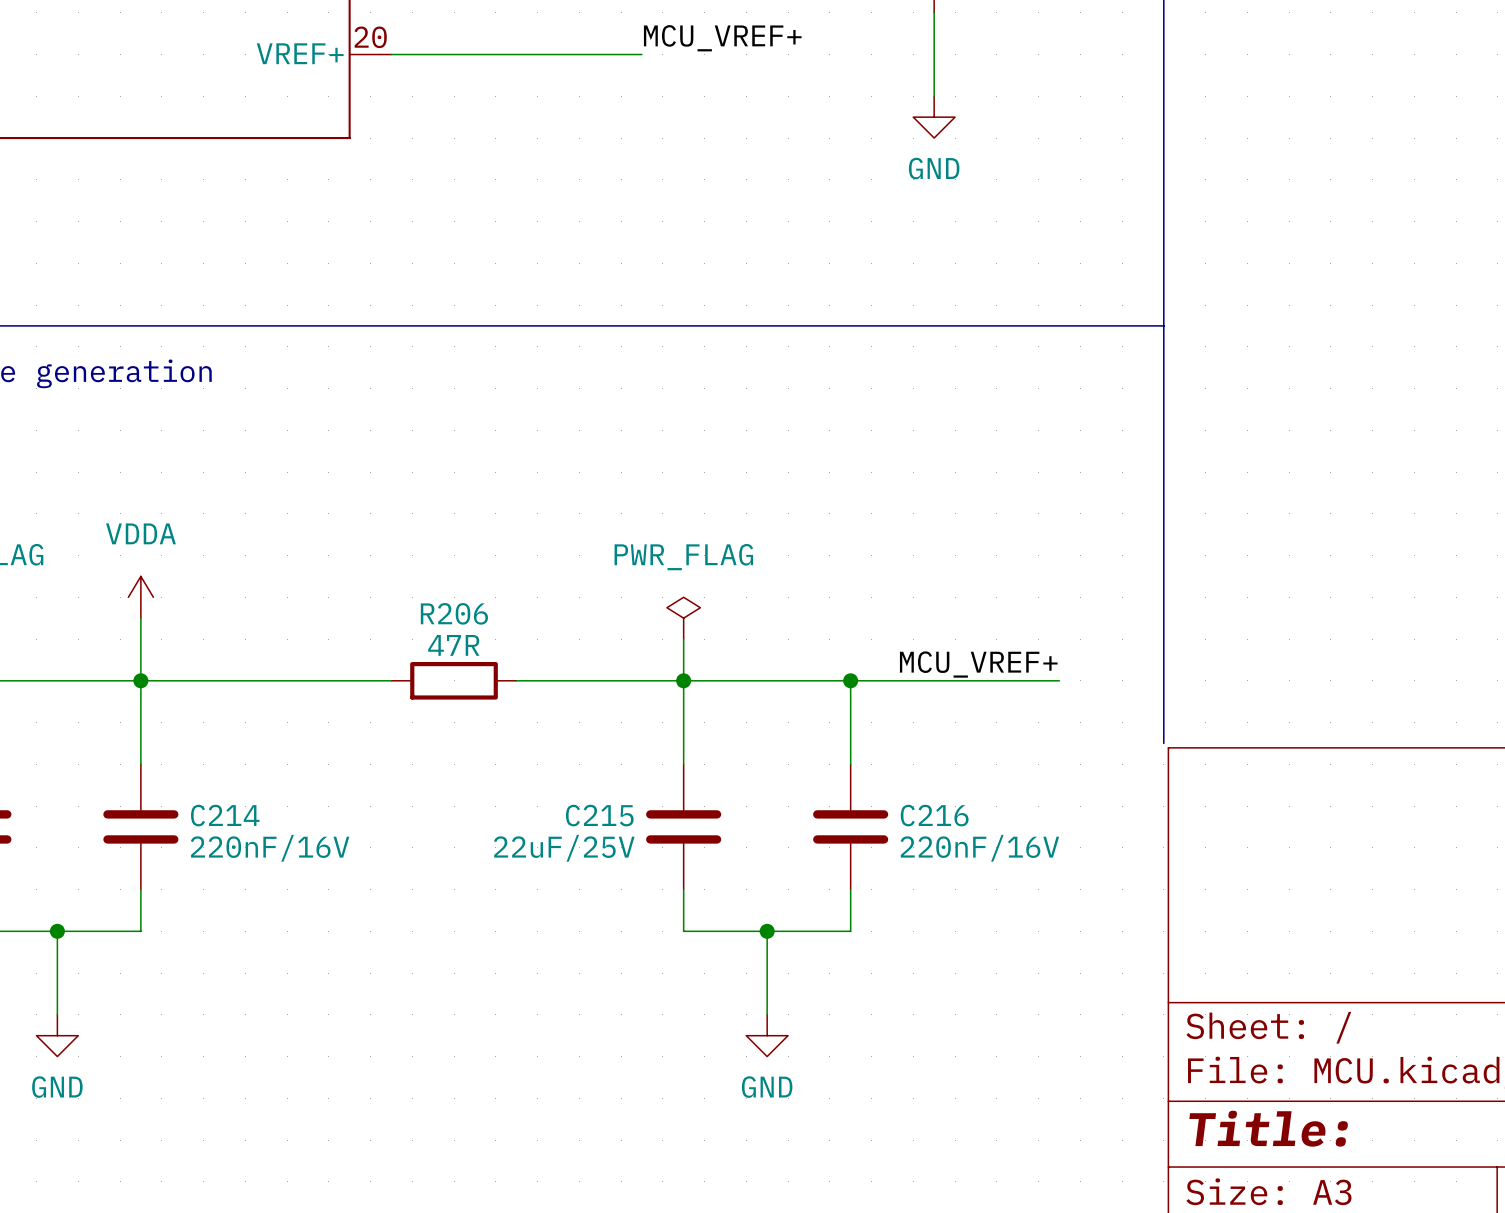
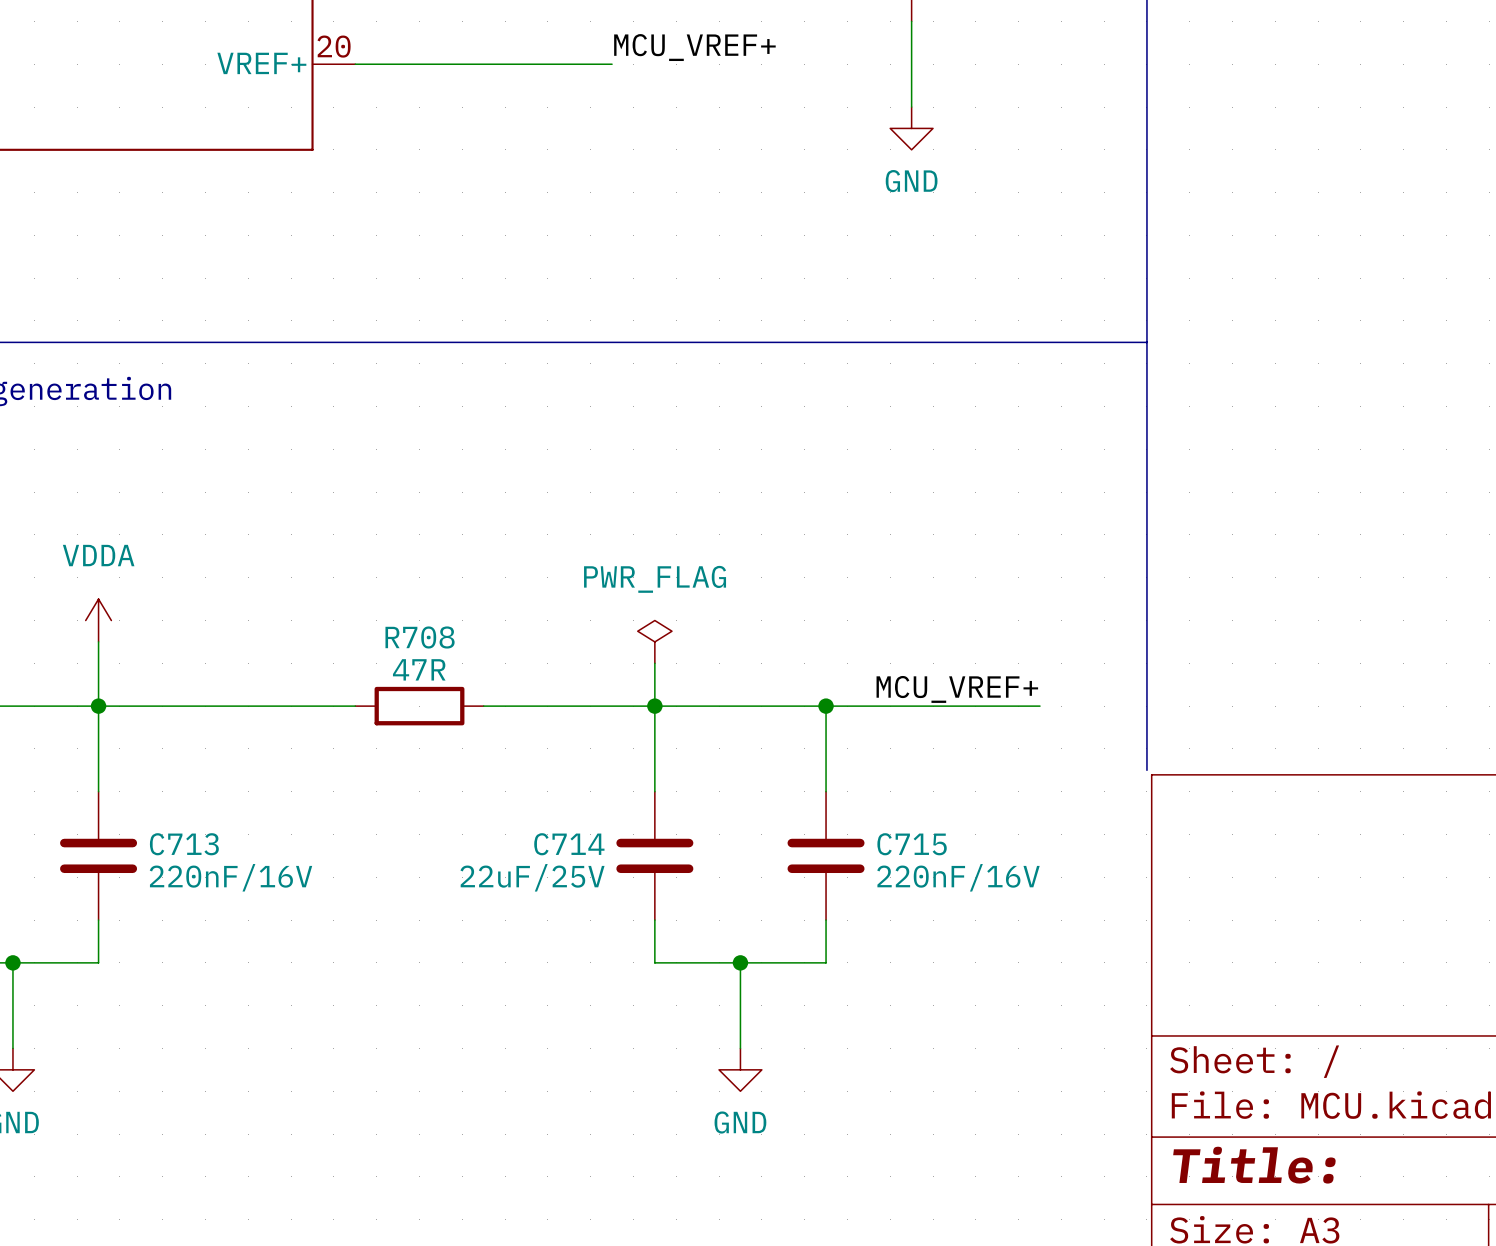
R206 name: R206 (454, 613) -> R708 (420, 637)
C214 name: C214 (225, 815) -> C713 (184, 844)
C215 name: C215 (599, 815) -> C714 (569, 844)
C216 name: C216 (934, 815) -> C715 (912, 844)

